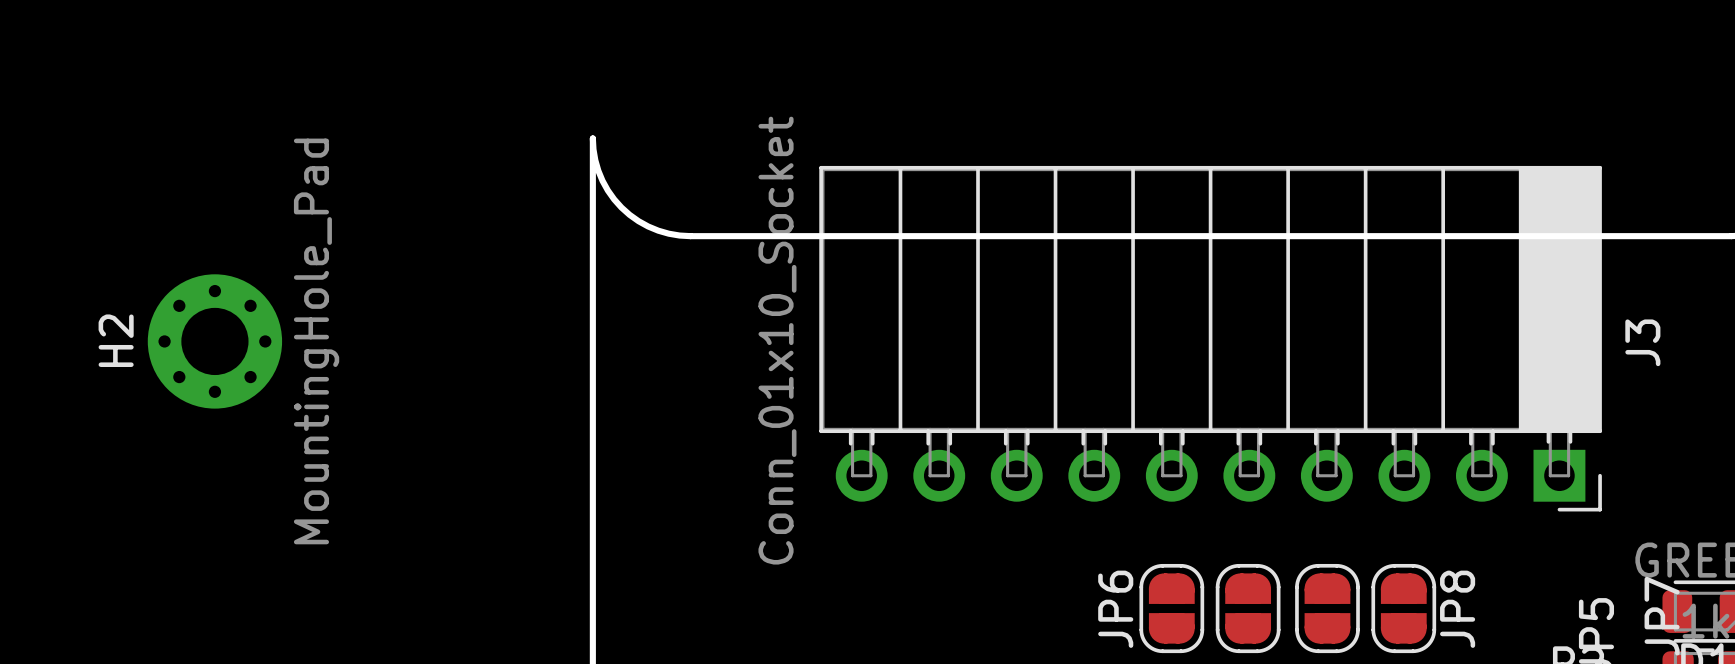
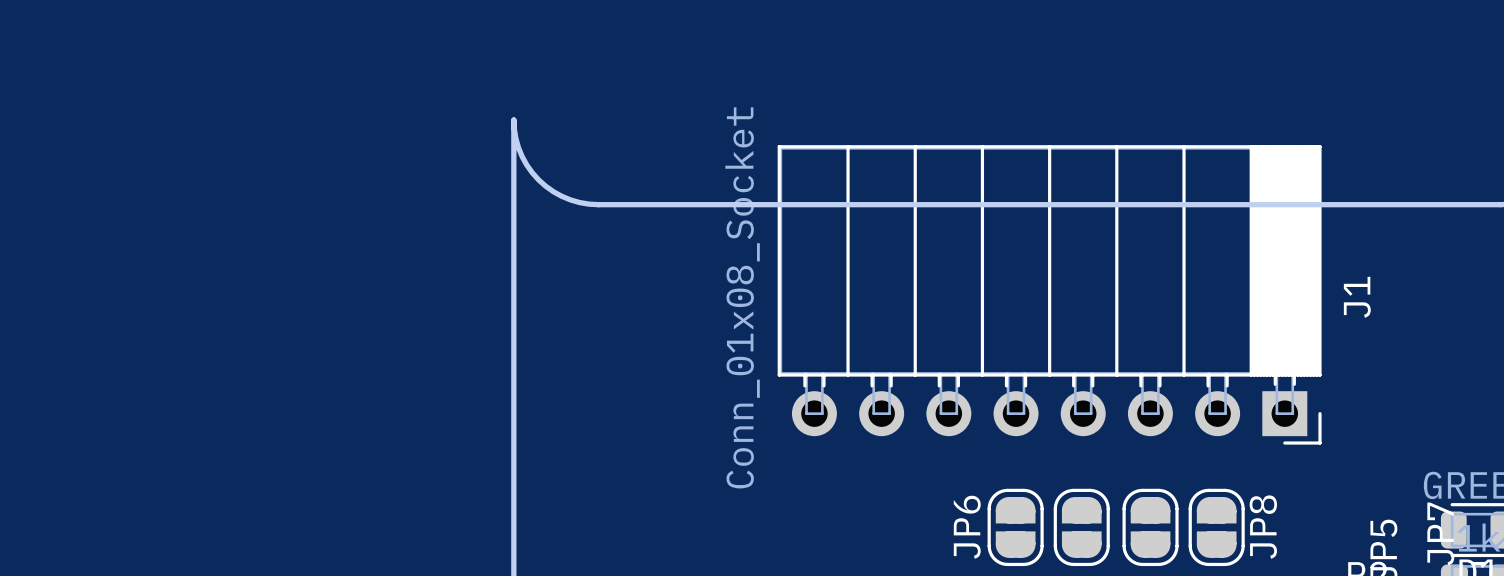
J3: Conn_01x10_Socket (1210, 338) -> none
J1: none -> Conn_01x08_Socket (1049, 294)
H2: MountingHole_Pad (214, 341) -> none

